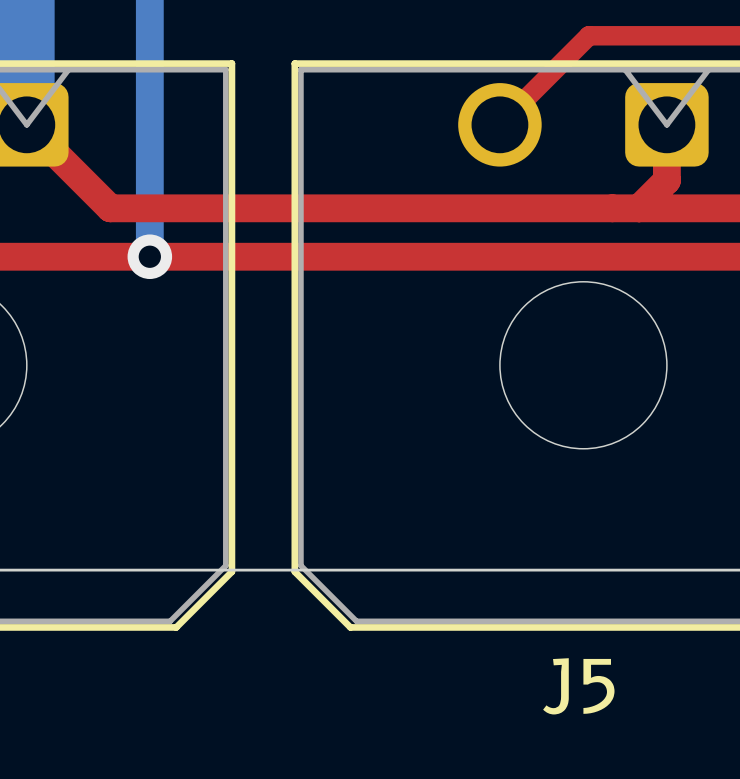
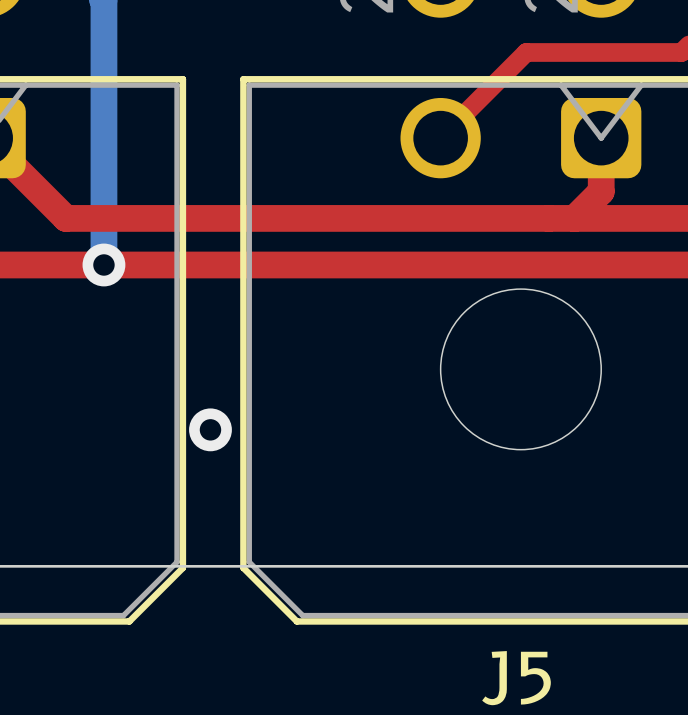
via: none -> (210, 429)

